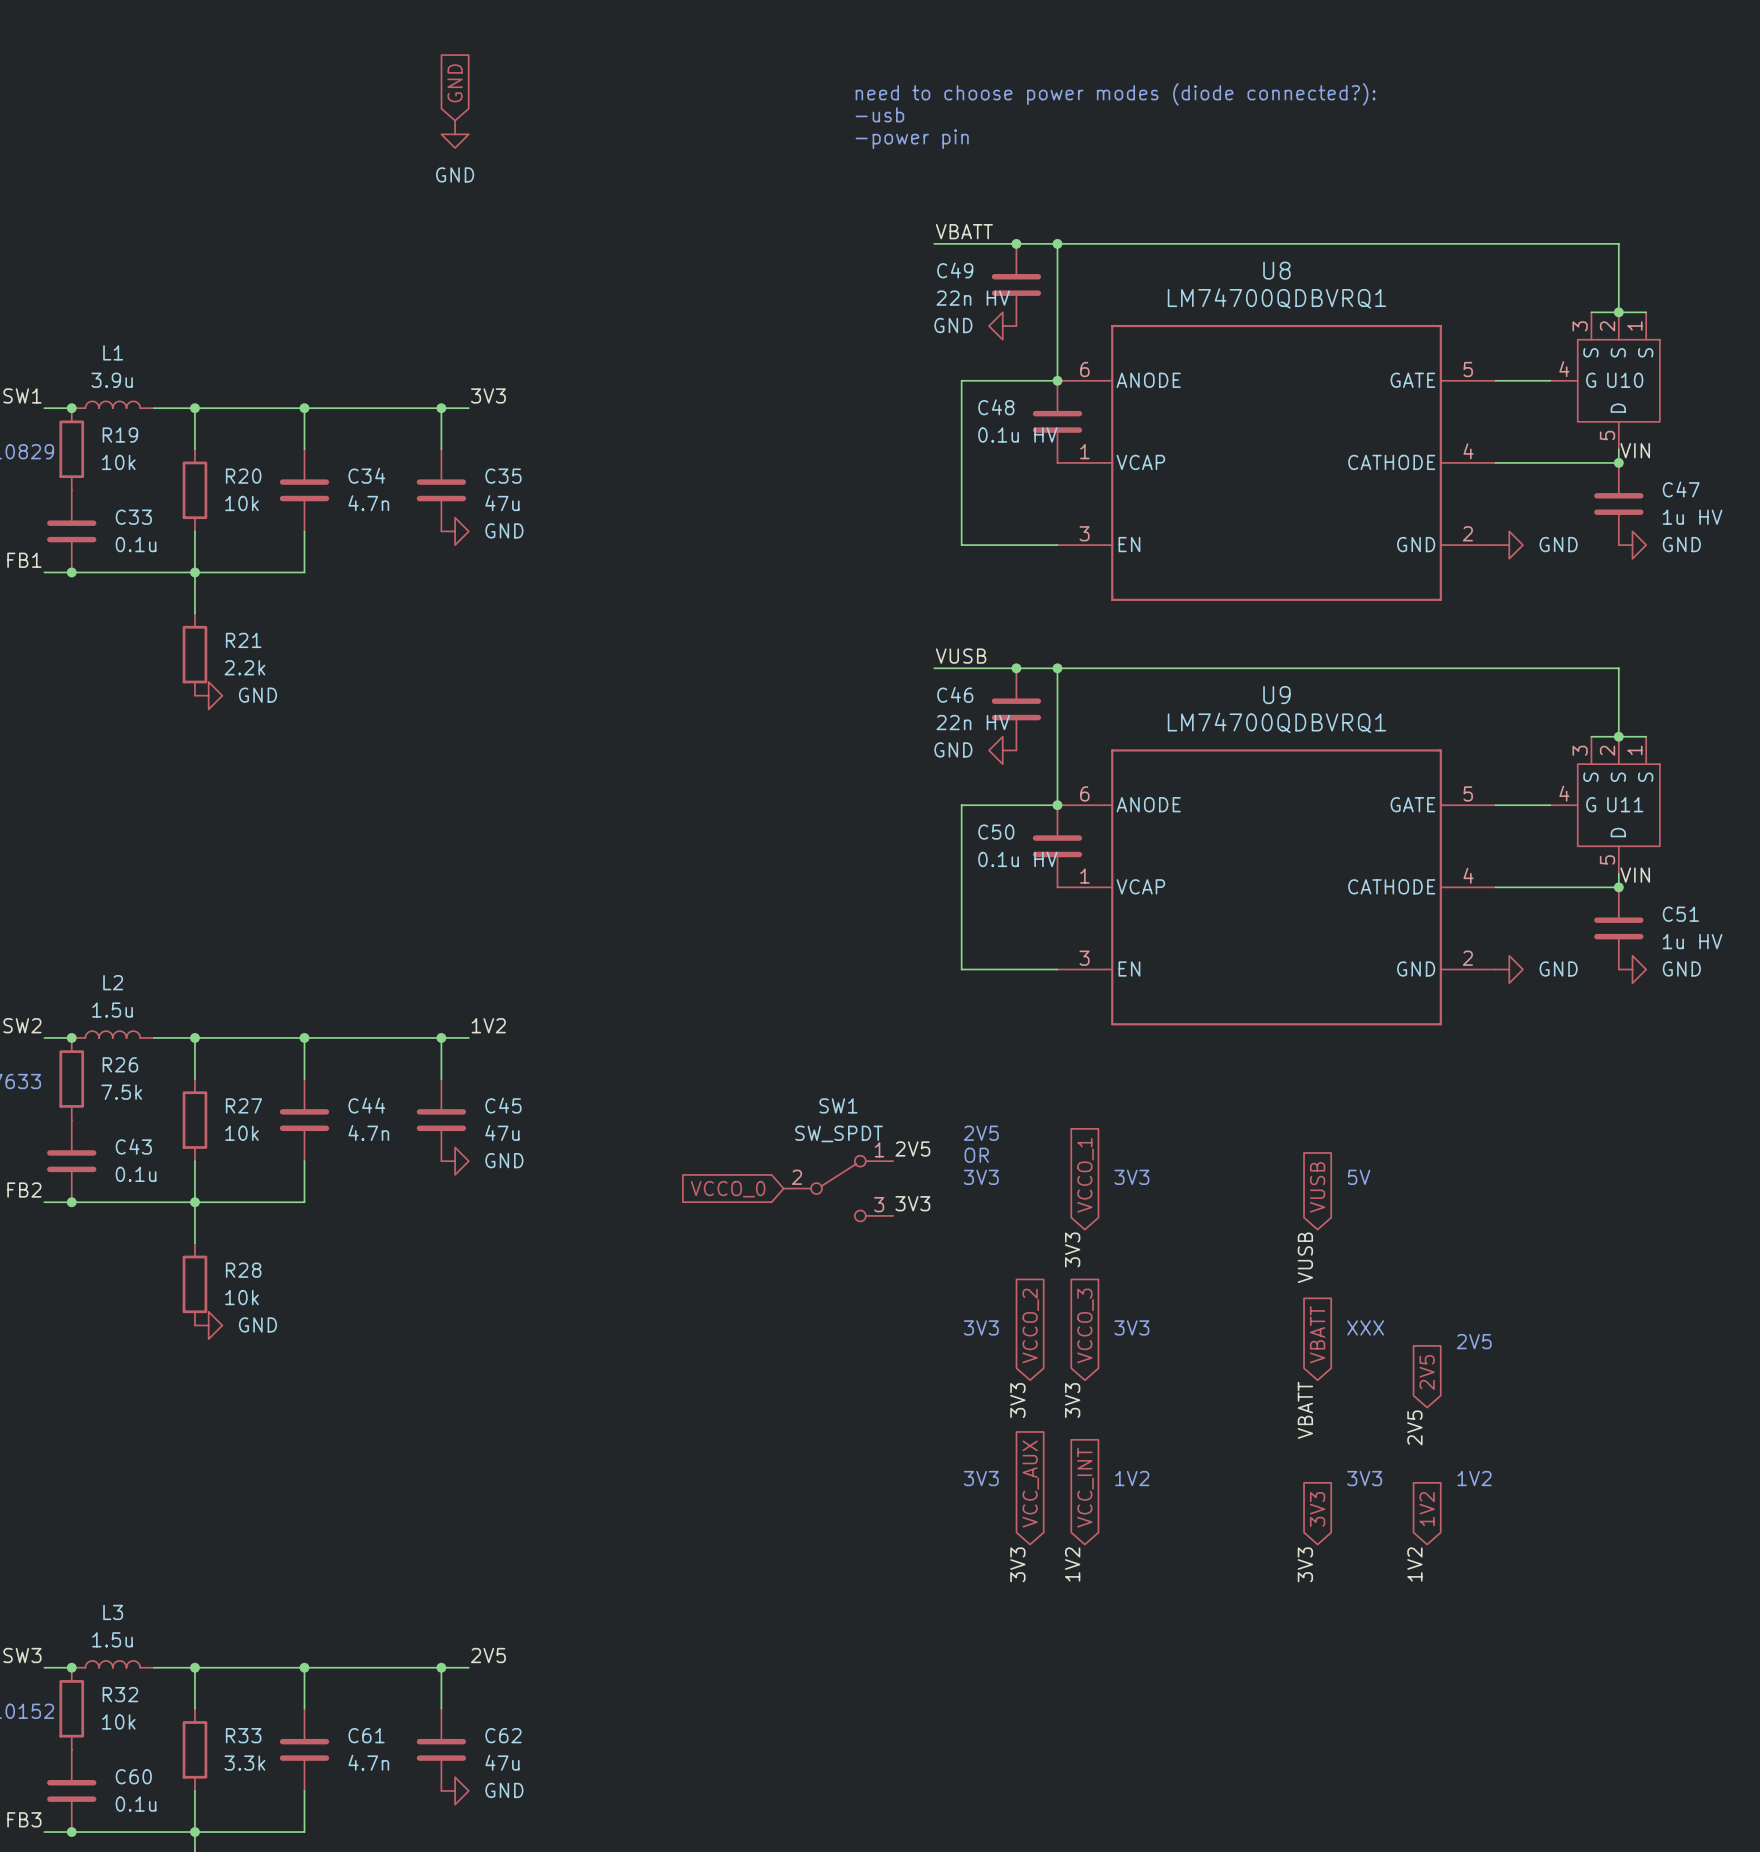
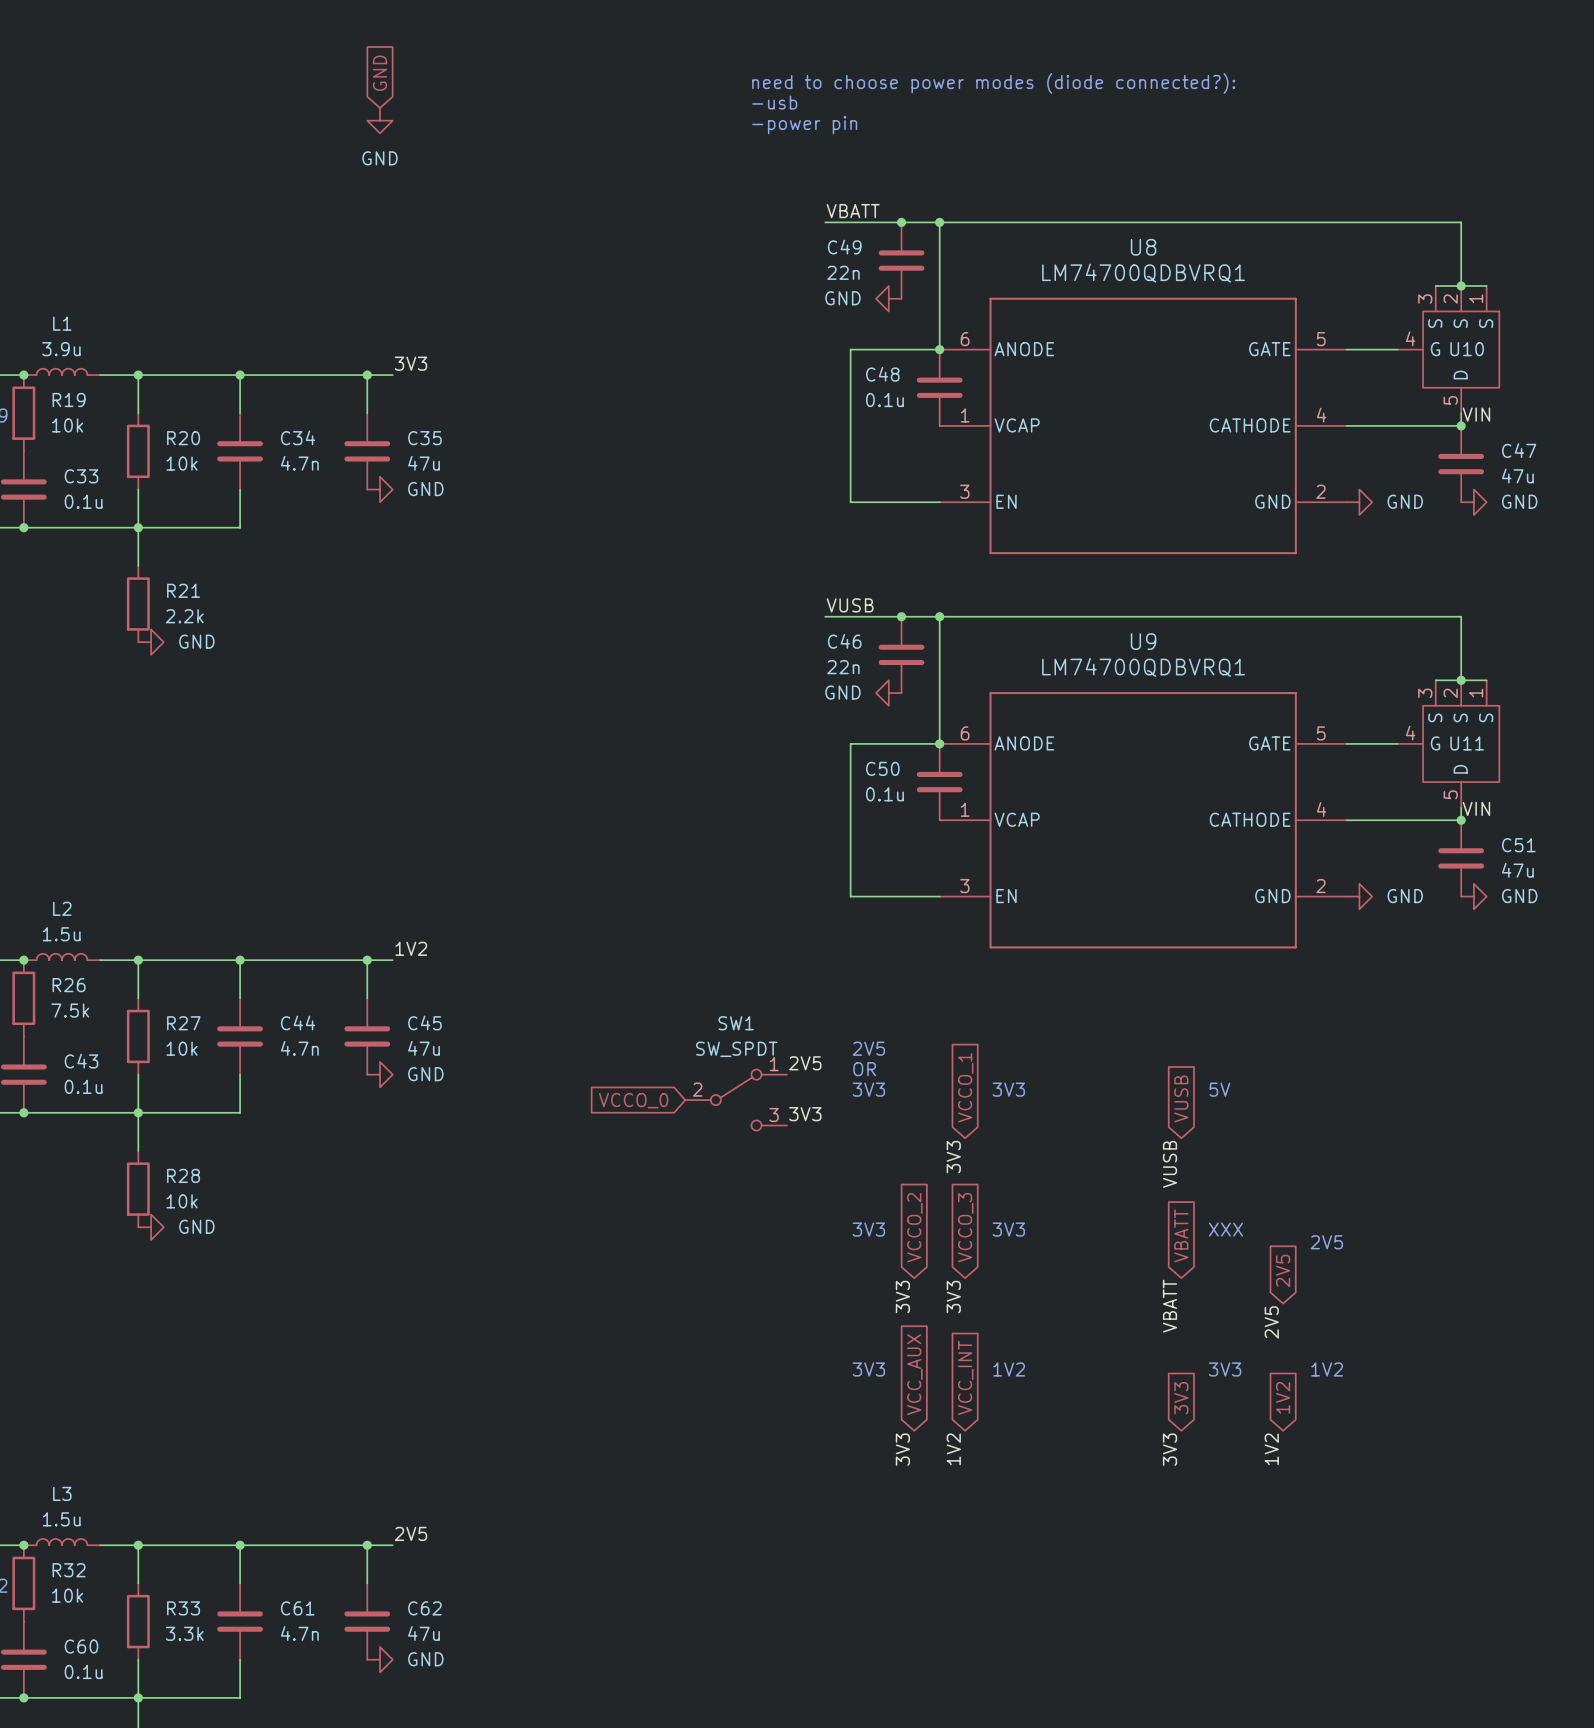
C49 value: 22n HV (973, 298) -> 22n (843, 272)
C48 value: 0.1u HV (1017, 435) -> 0.1u (884, 400)
C47 value: 1u HV (1692, 517) -> 47u (1517, 476)
C46 value: 22n HV (973, 722) -> 22n (843, 667)
C50 value: 0.1u HV (1017, 859) -> 0.1u (884, 794)
C51 value: 1u HV (1692, 941) -> 47u (1517, 870)

